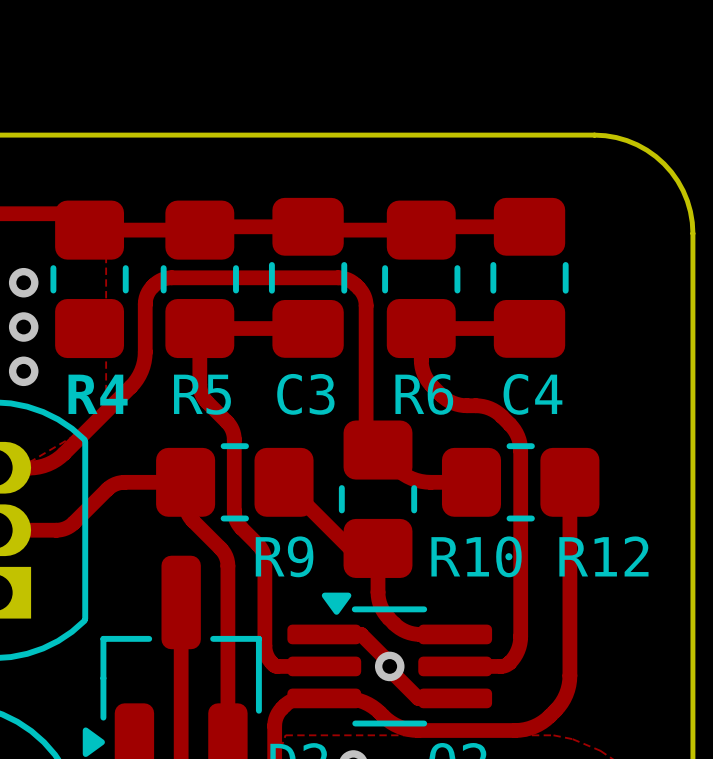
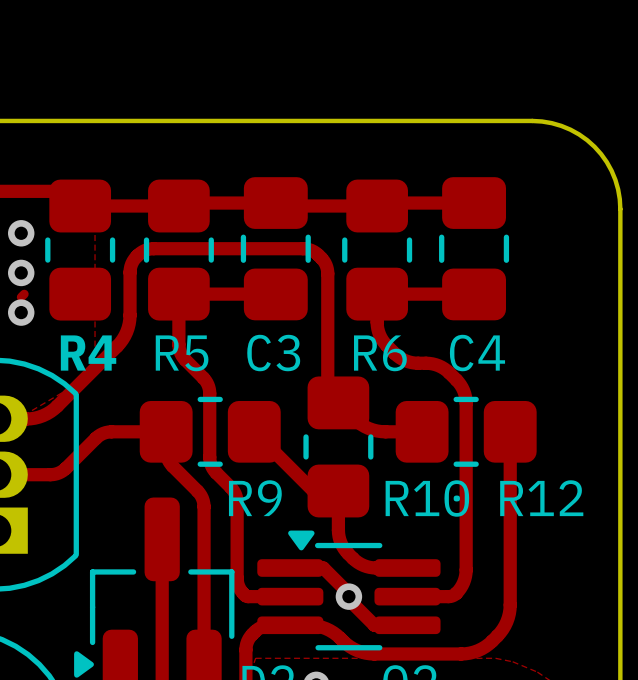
via: none -> (21, 233)
via: (23, 282) -> none
via: none -> (21, 272)
via: (23, 327) -> none
via: none -> (21, 312)
via: (23, 371) -> none

